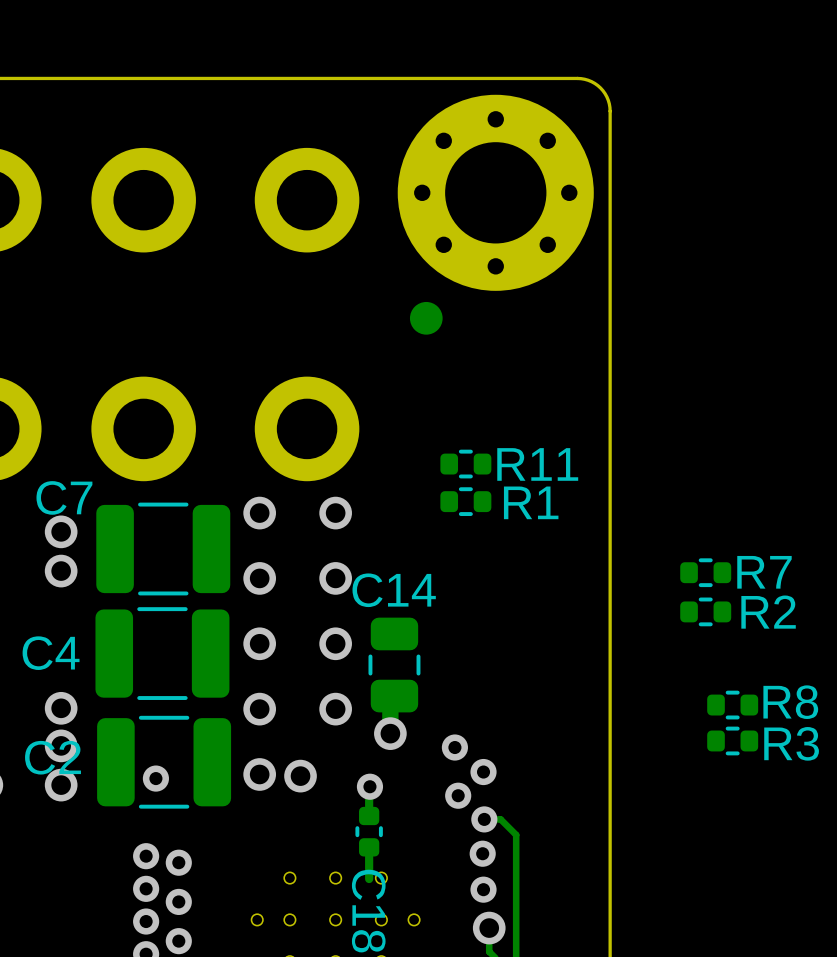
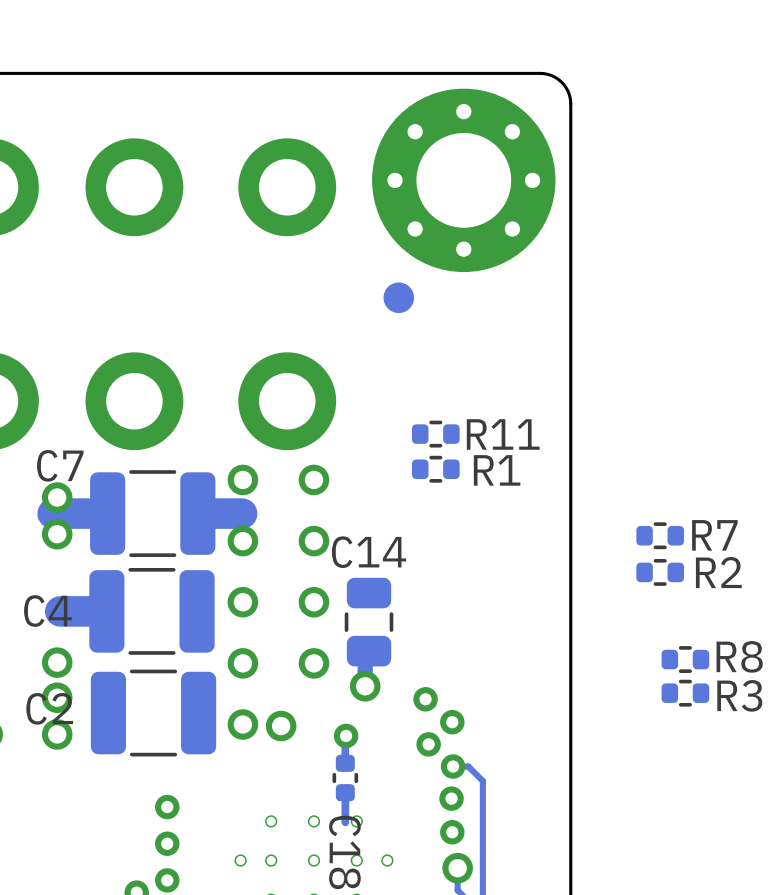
track: none -> (51, 512) (107, 513)
track: none -> (242, 513) (197, 513)
track: none -> (106, 611) (59, 612)
via: (155, 778) -> none
via: (146, 856) -> none
via: (146, 888) -> none
via: (146, 921) -> none

